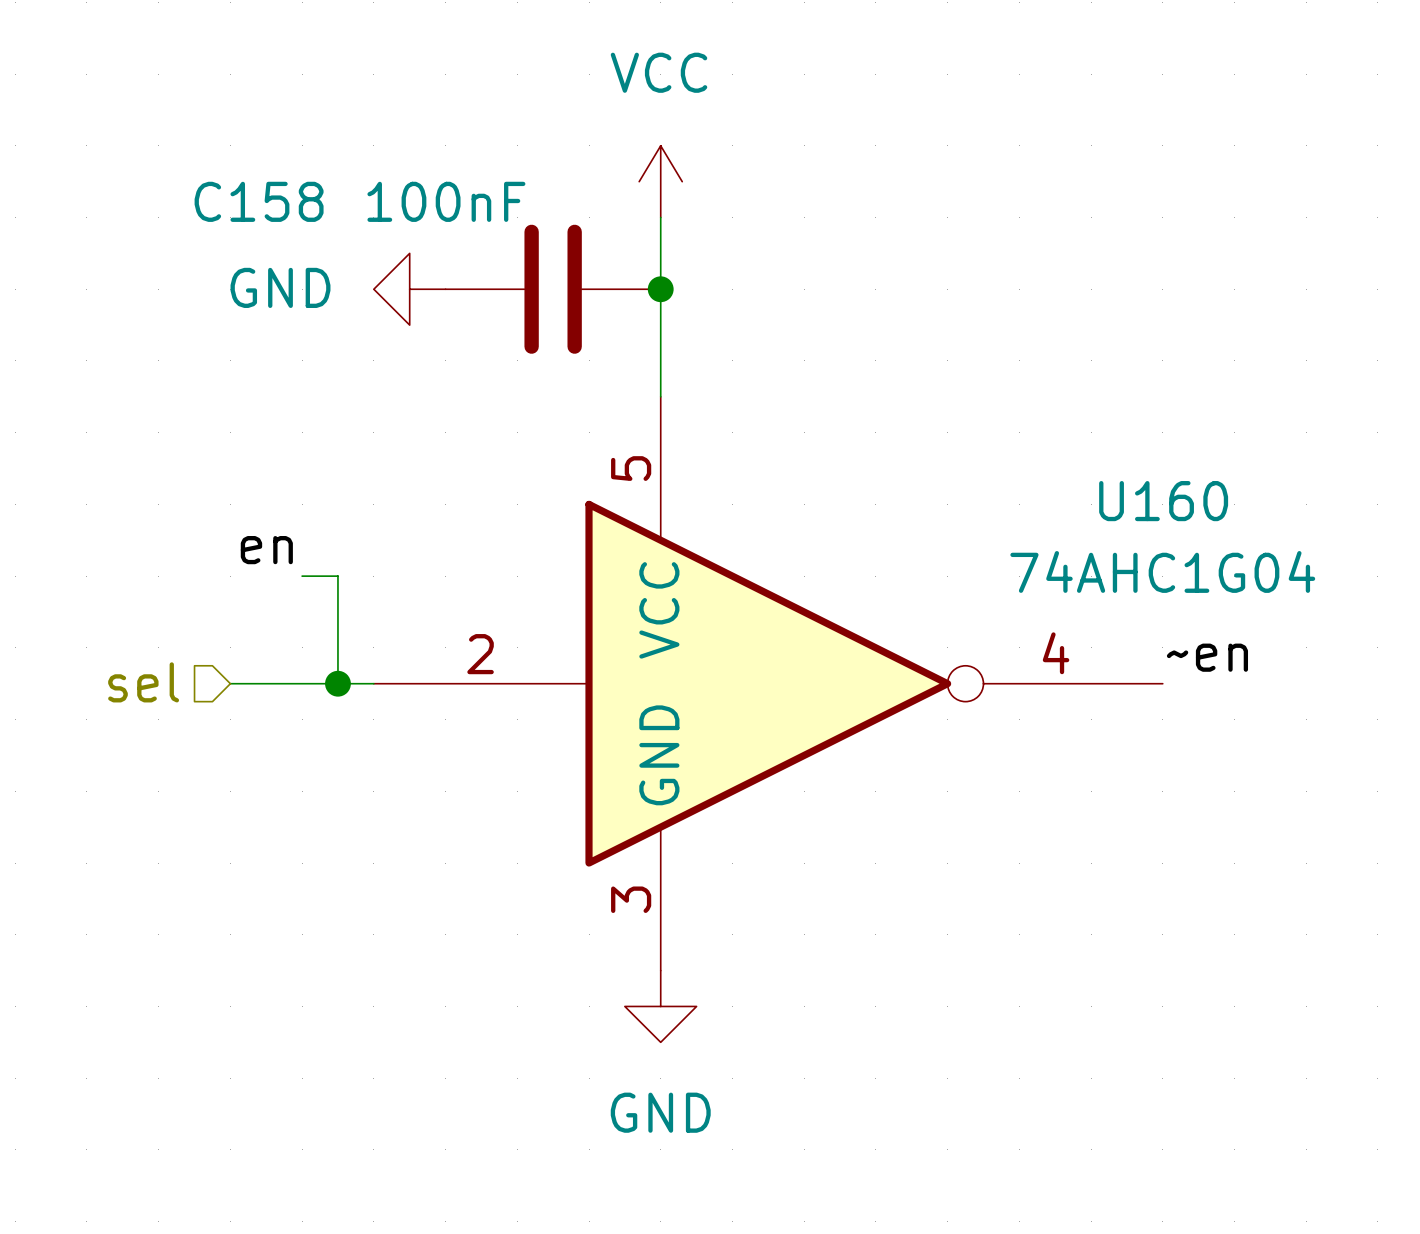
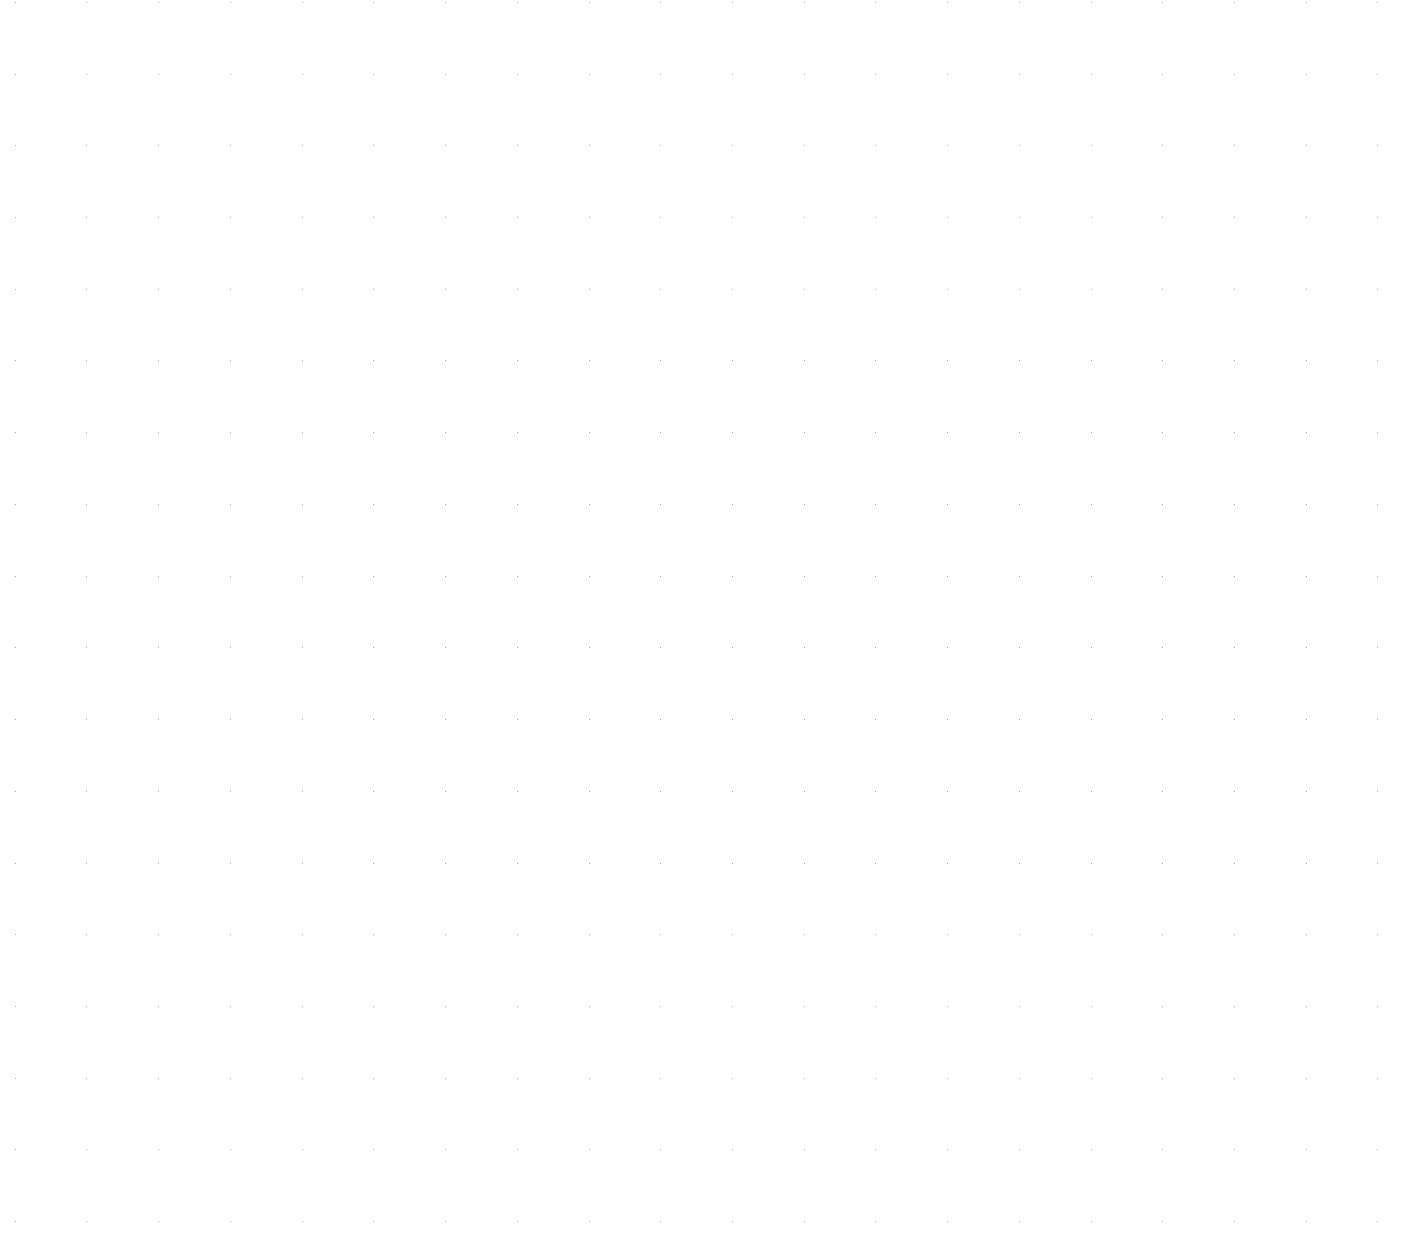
power symbol: VCC (660, 181) -> none
wire: (660, 217) (660, 396) -> none
power symbol: GND (409, 289) -> none
C158: 100nF (553, 289) -> none
junction: (660, 289) -> none
label: en (266, 550) -> none
wire: (302, 576) (337, 576) (337, 683) -> none
label: ~en (1207, 657) -> none
hierarchical label: sel (143, 682) -> none
wire: (230, 683) (373, 683) -> none
junction: (337, 683) -> none
U160: 74AHC1G04 (768, 683) -> none
power symbol: GND (660, 1006) -> none

